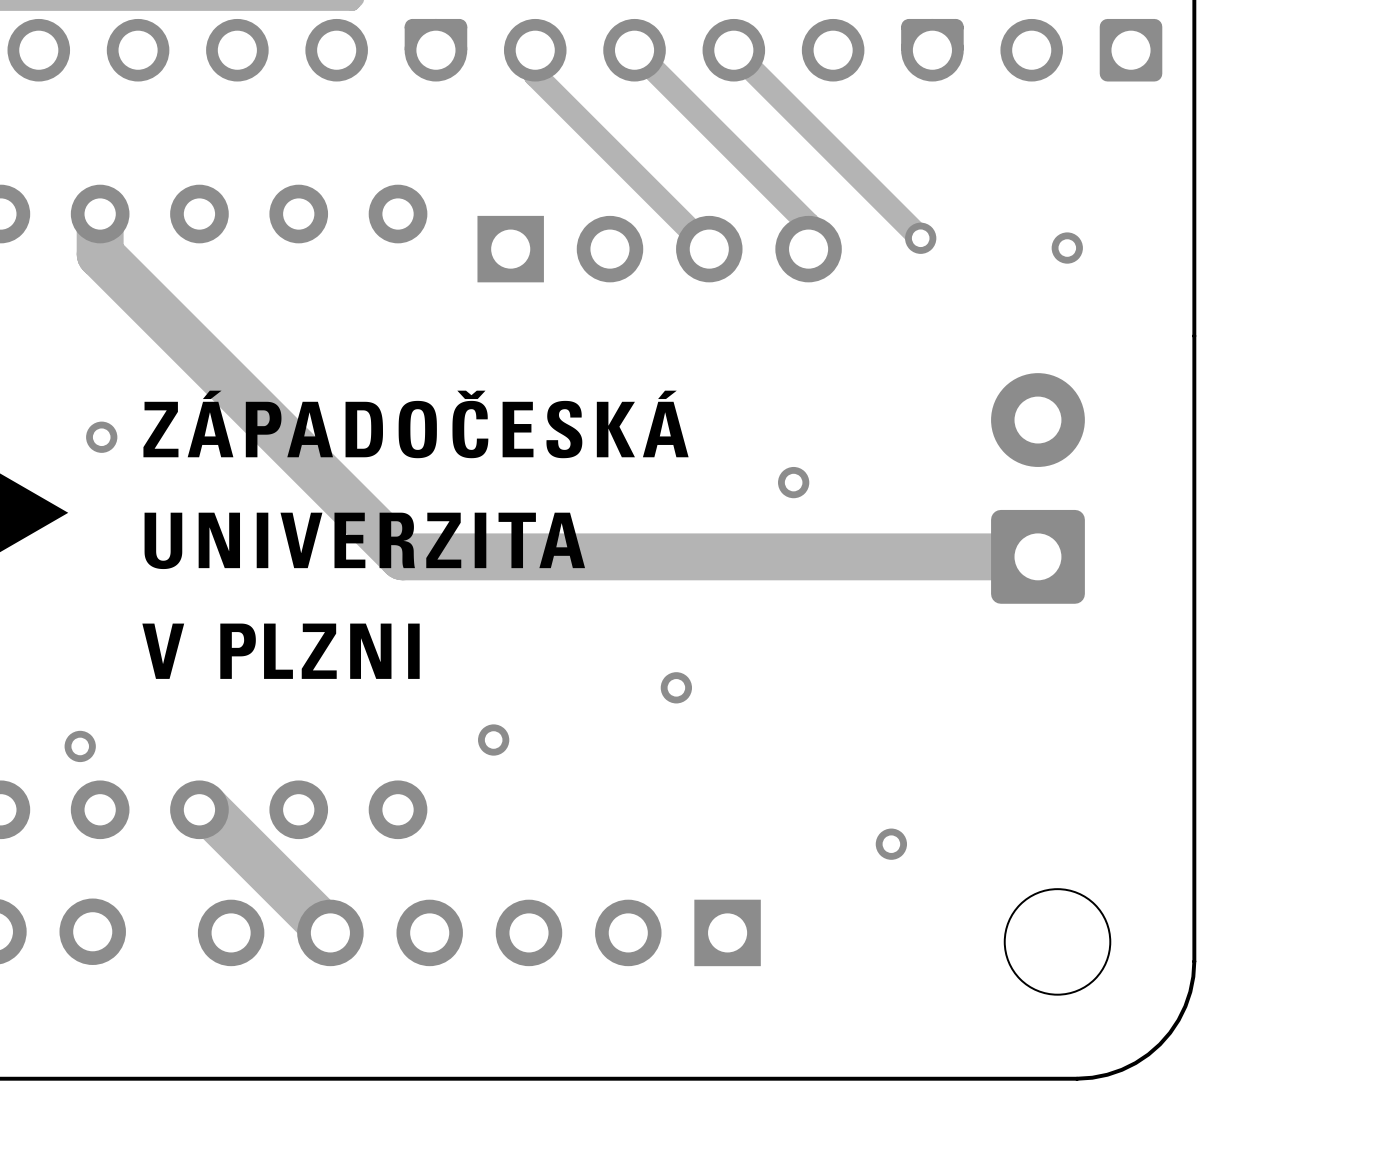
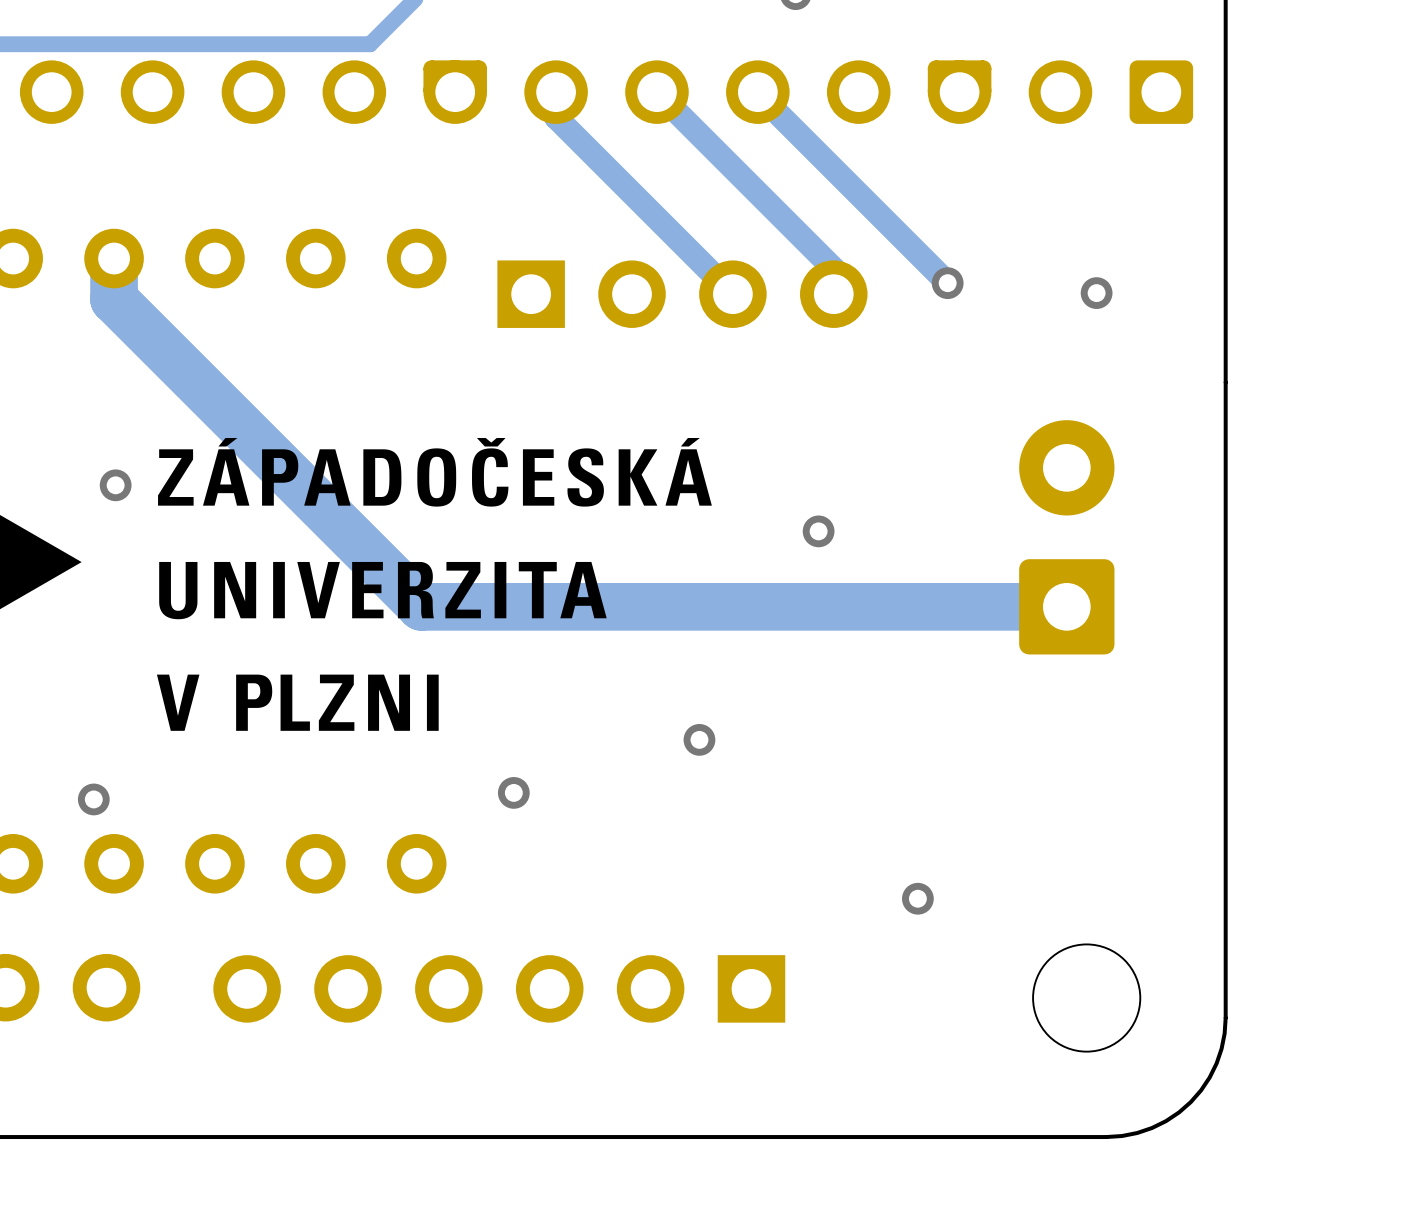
track: (199, 809) (207, 809) (330, 932) -> none

